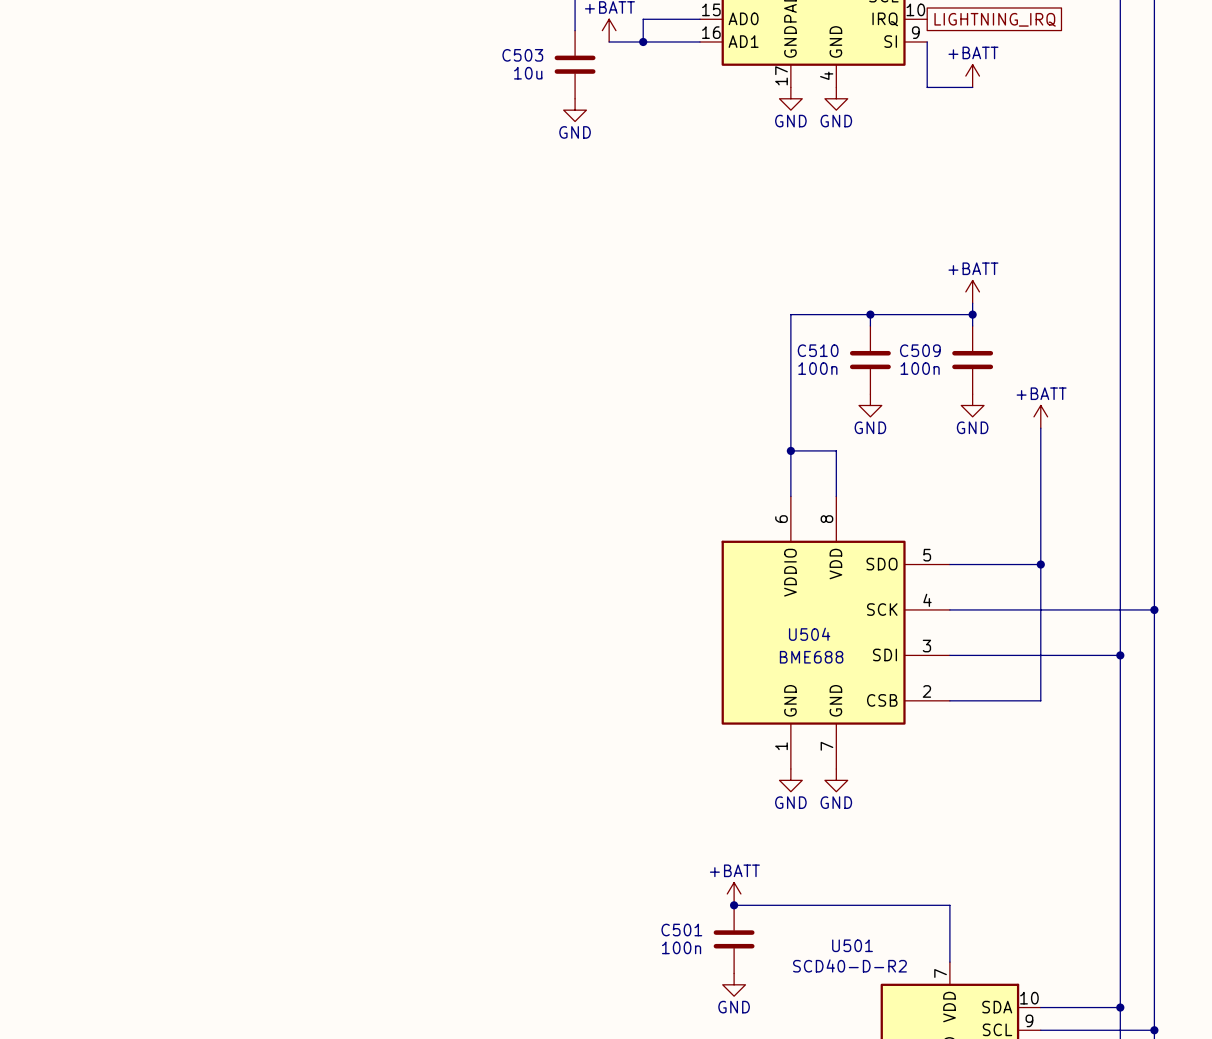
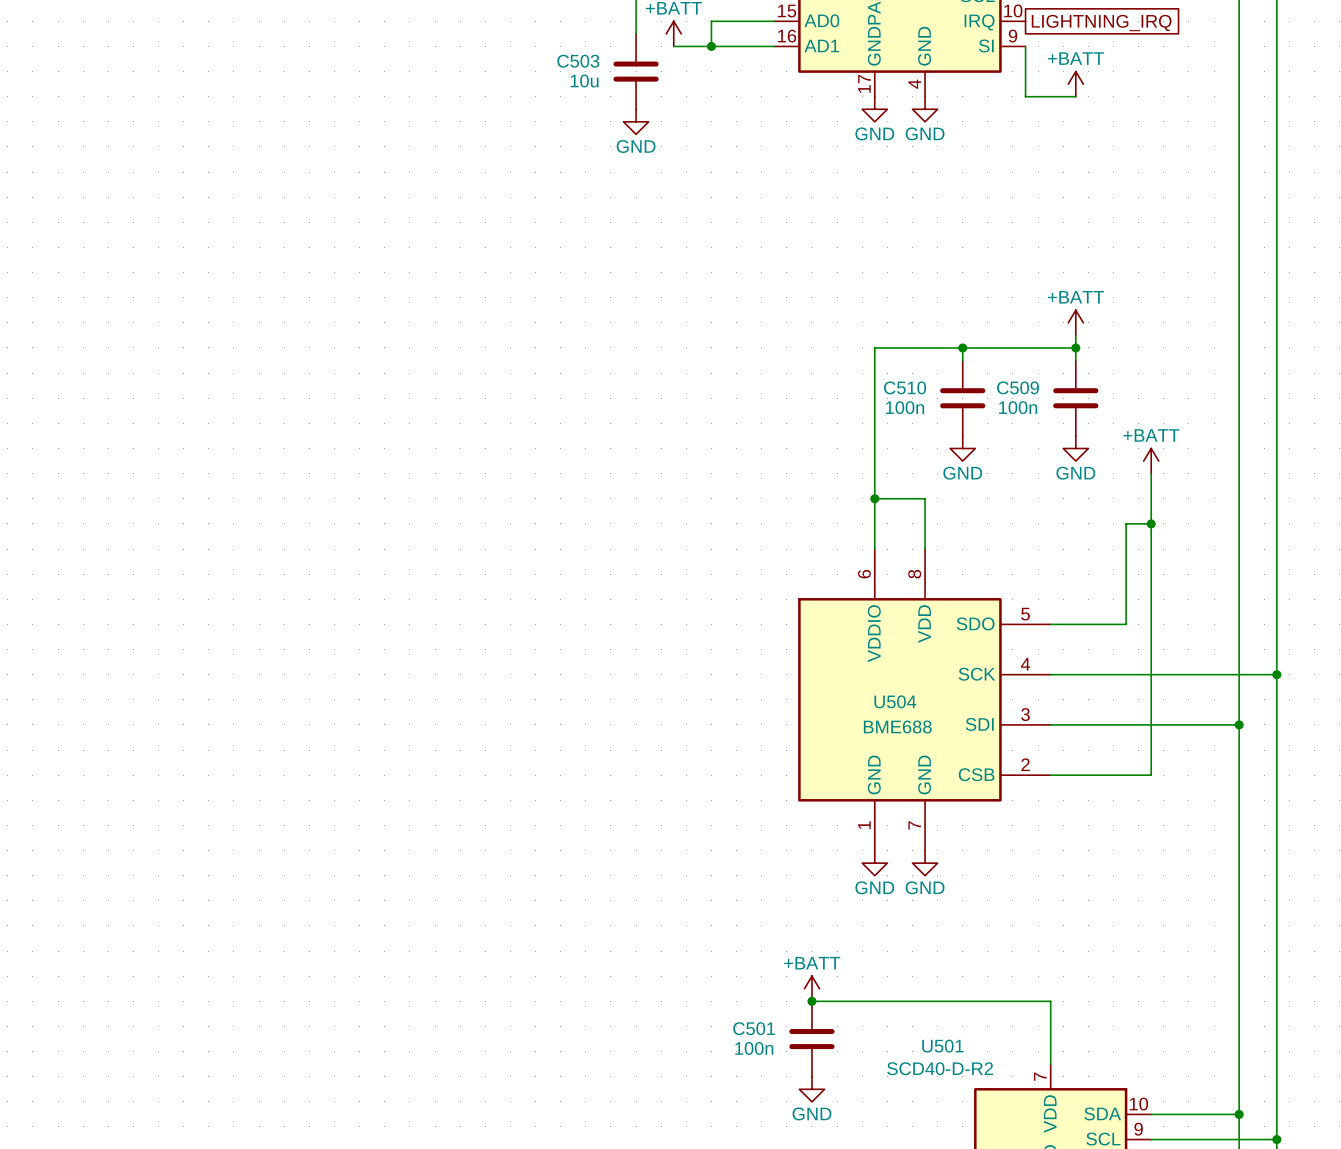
junction: none -> (1151, 523)
wire: (1018, 564) (1040, 564) -> (1126, 624) (1126, 523) (1151, 523)
junction: (1040, 564) -> none

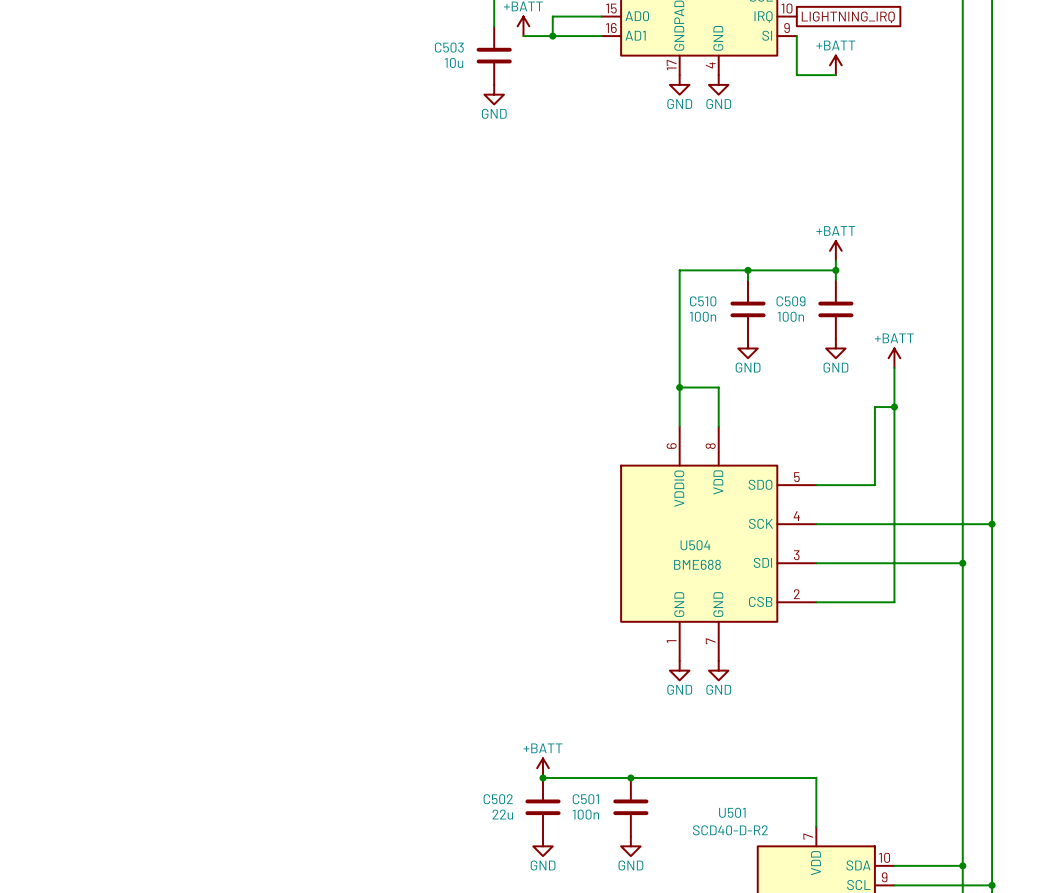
power symbol position: +BATT (811, 988) -> +BATT (543, 768)
wire: none -> (543, 778) (630, 778)
junction: none -> (543, 778)
C502: none -> 22u (543, 807)
power symbol: none -> GND (543, 846)

